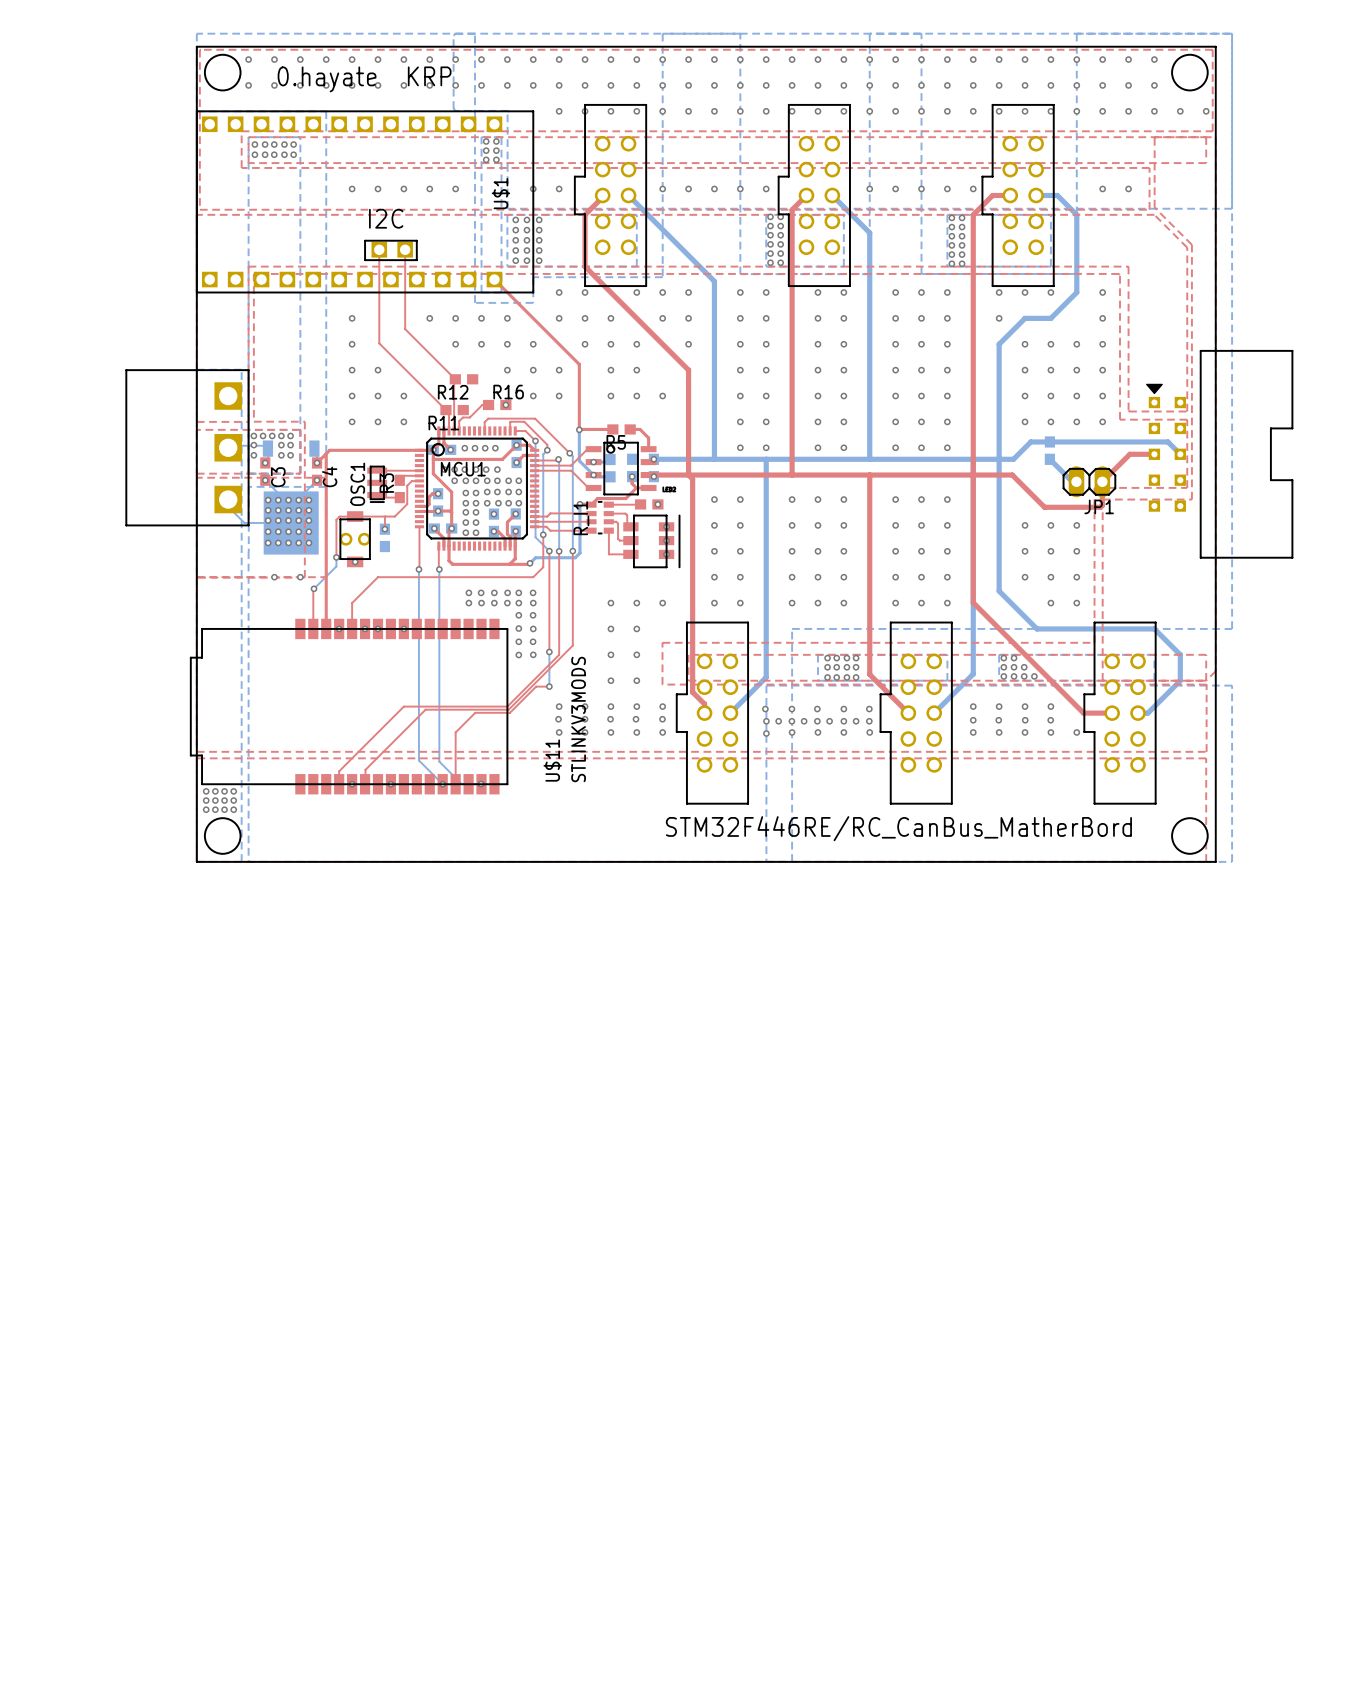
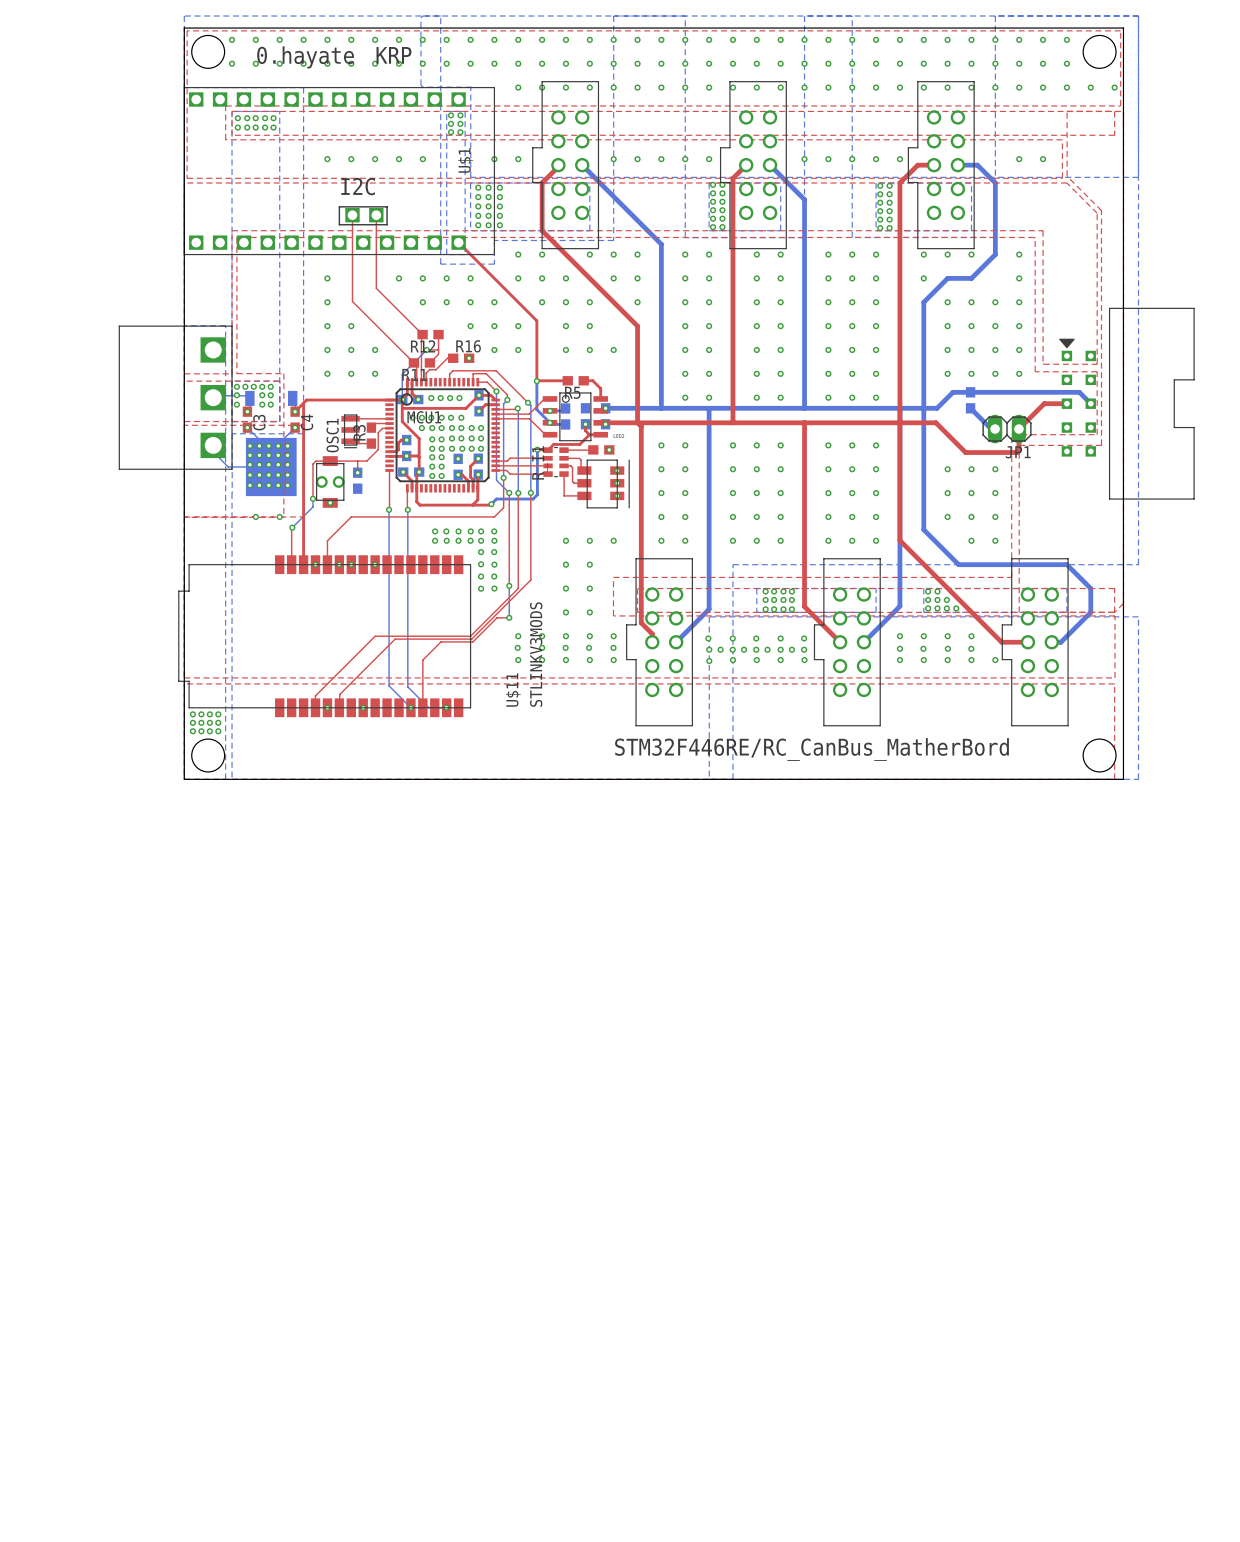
top track: none -> (438, 334) (438, 354) (429, 362)
bottom track: none -> (426, 349) (402, 374) (402, 399)
top track: none -> (426, 349) (438, 349)
via: none -> (426, 349)

